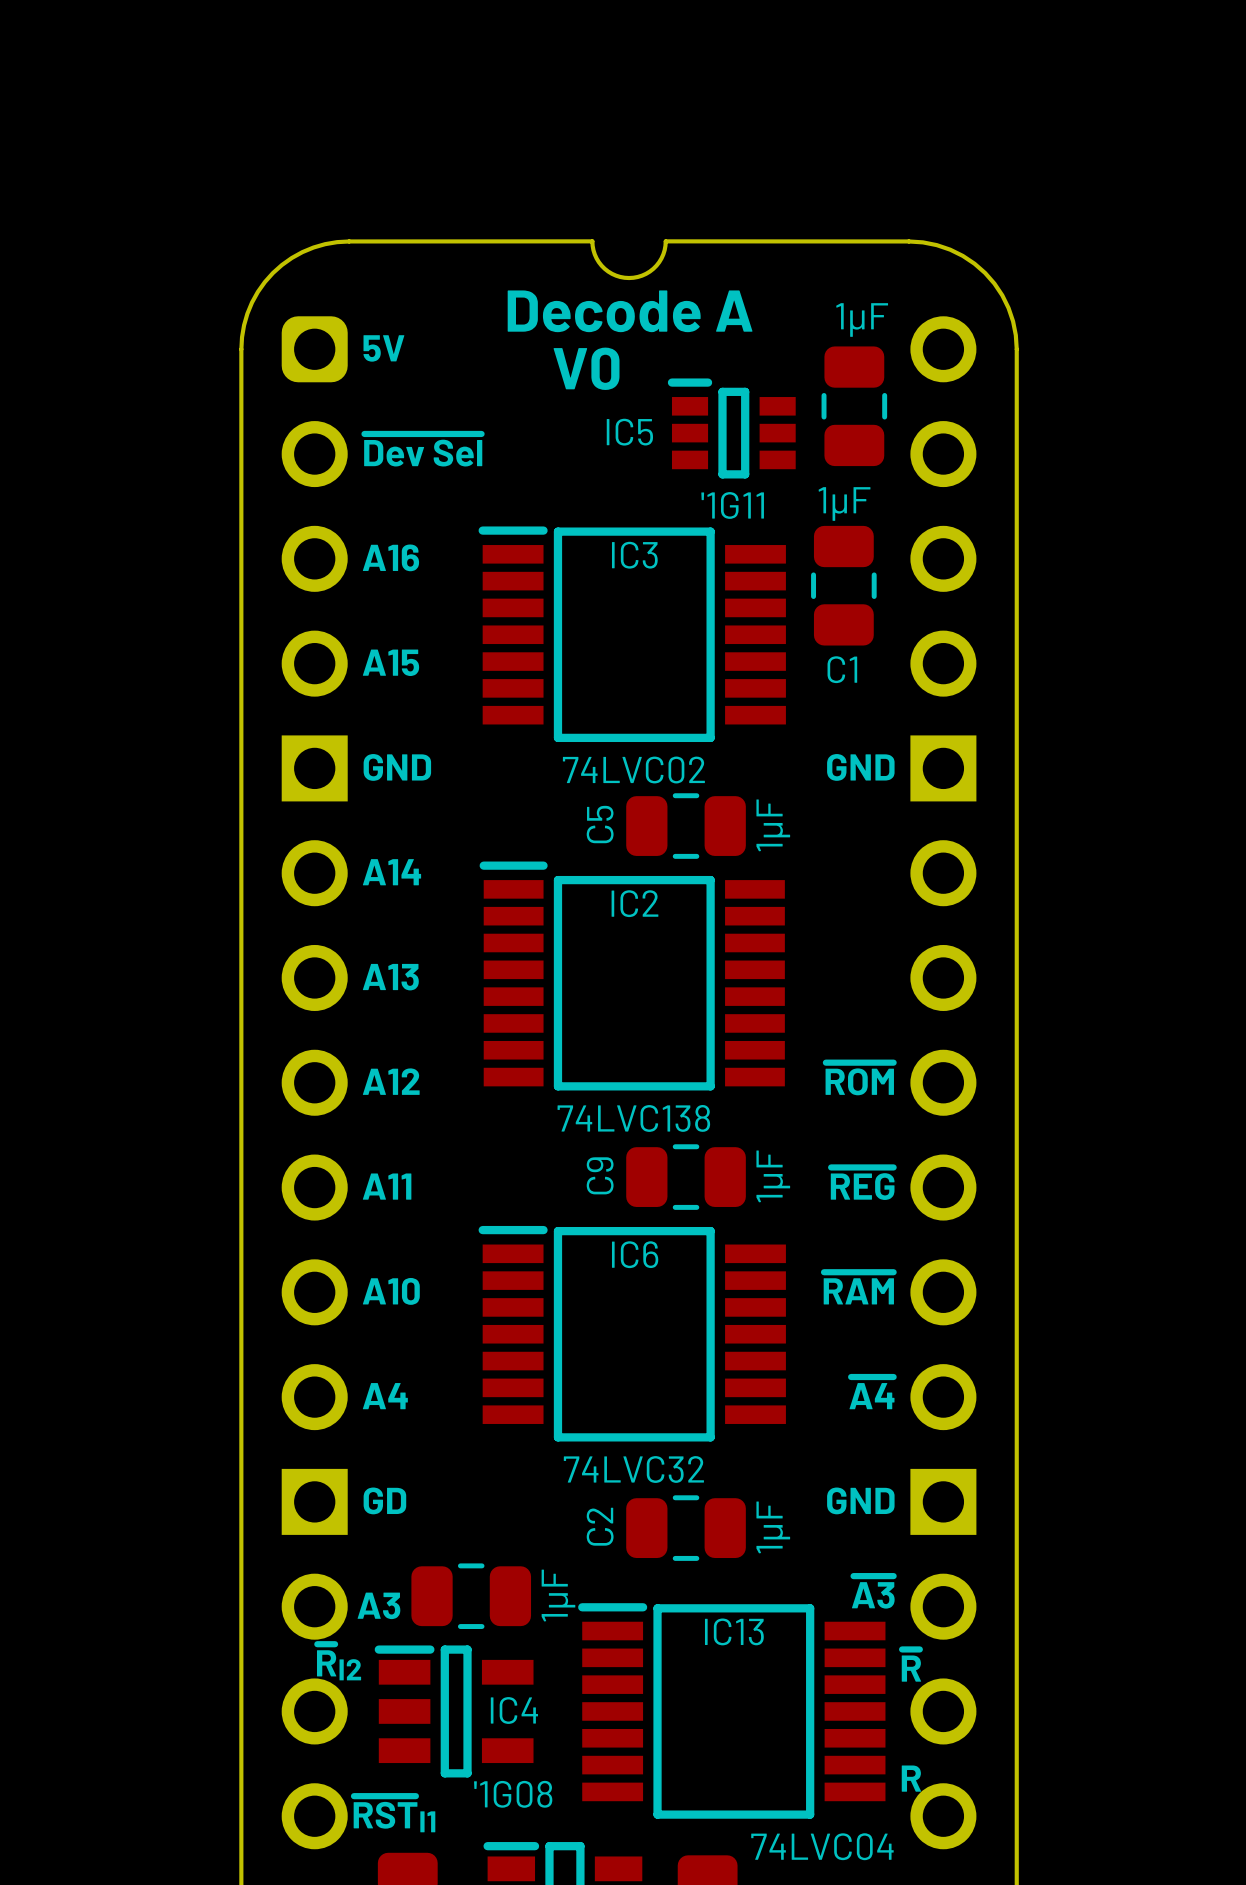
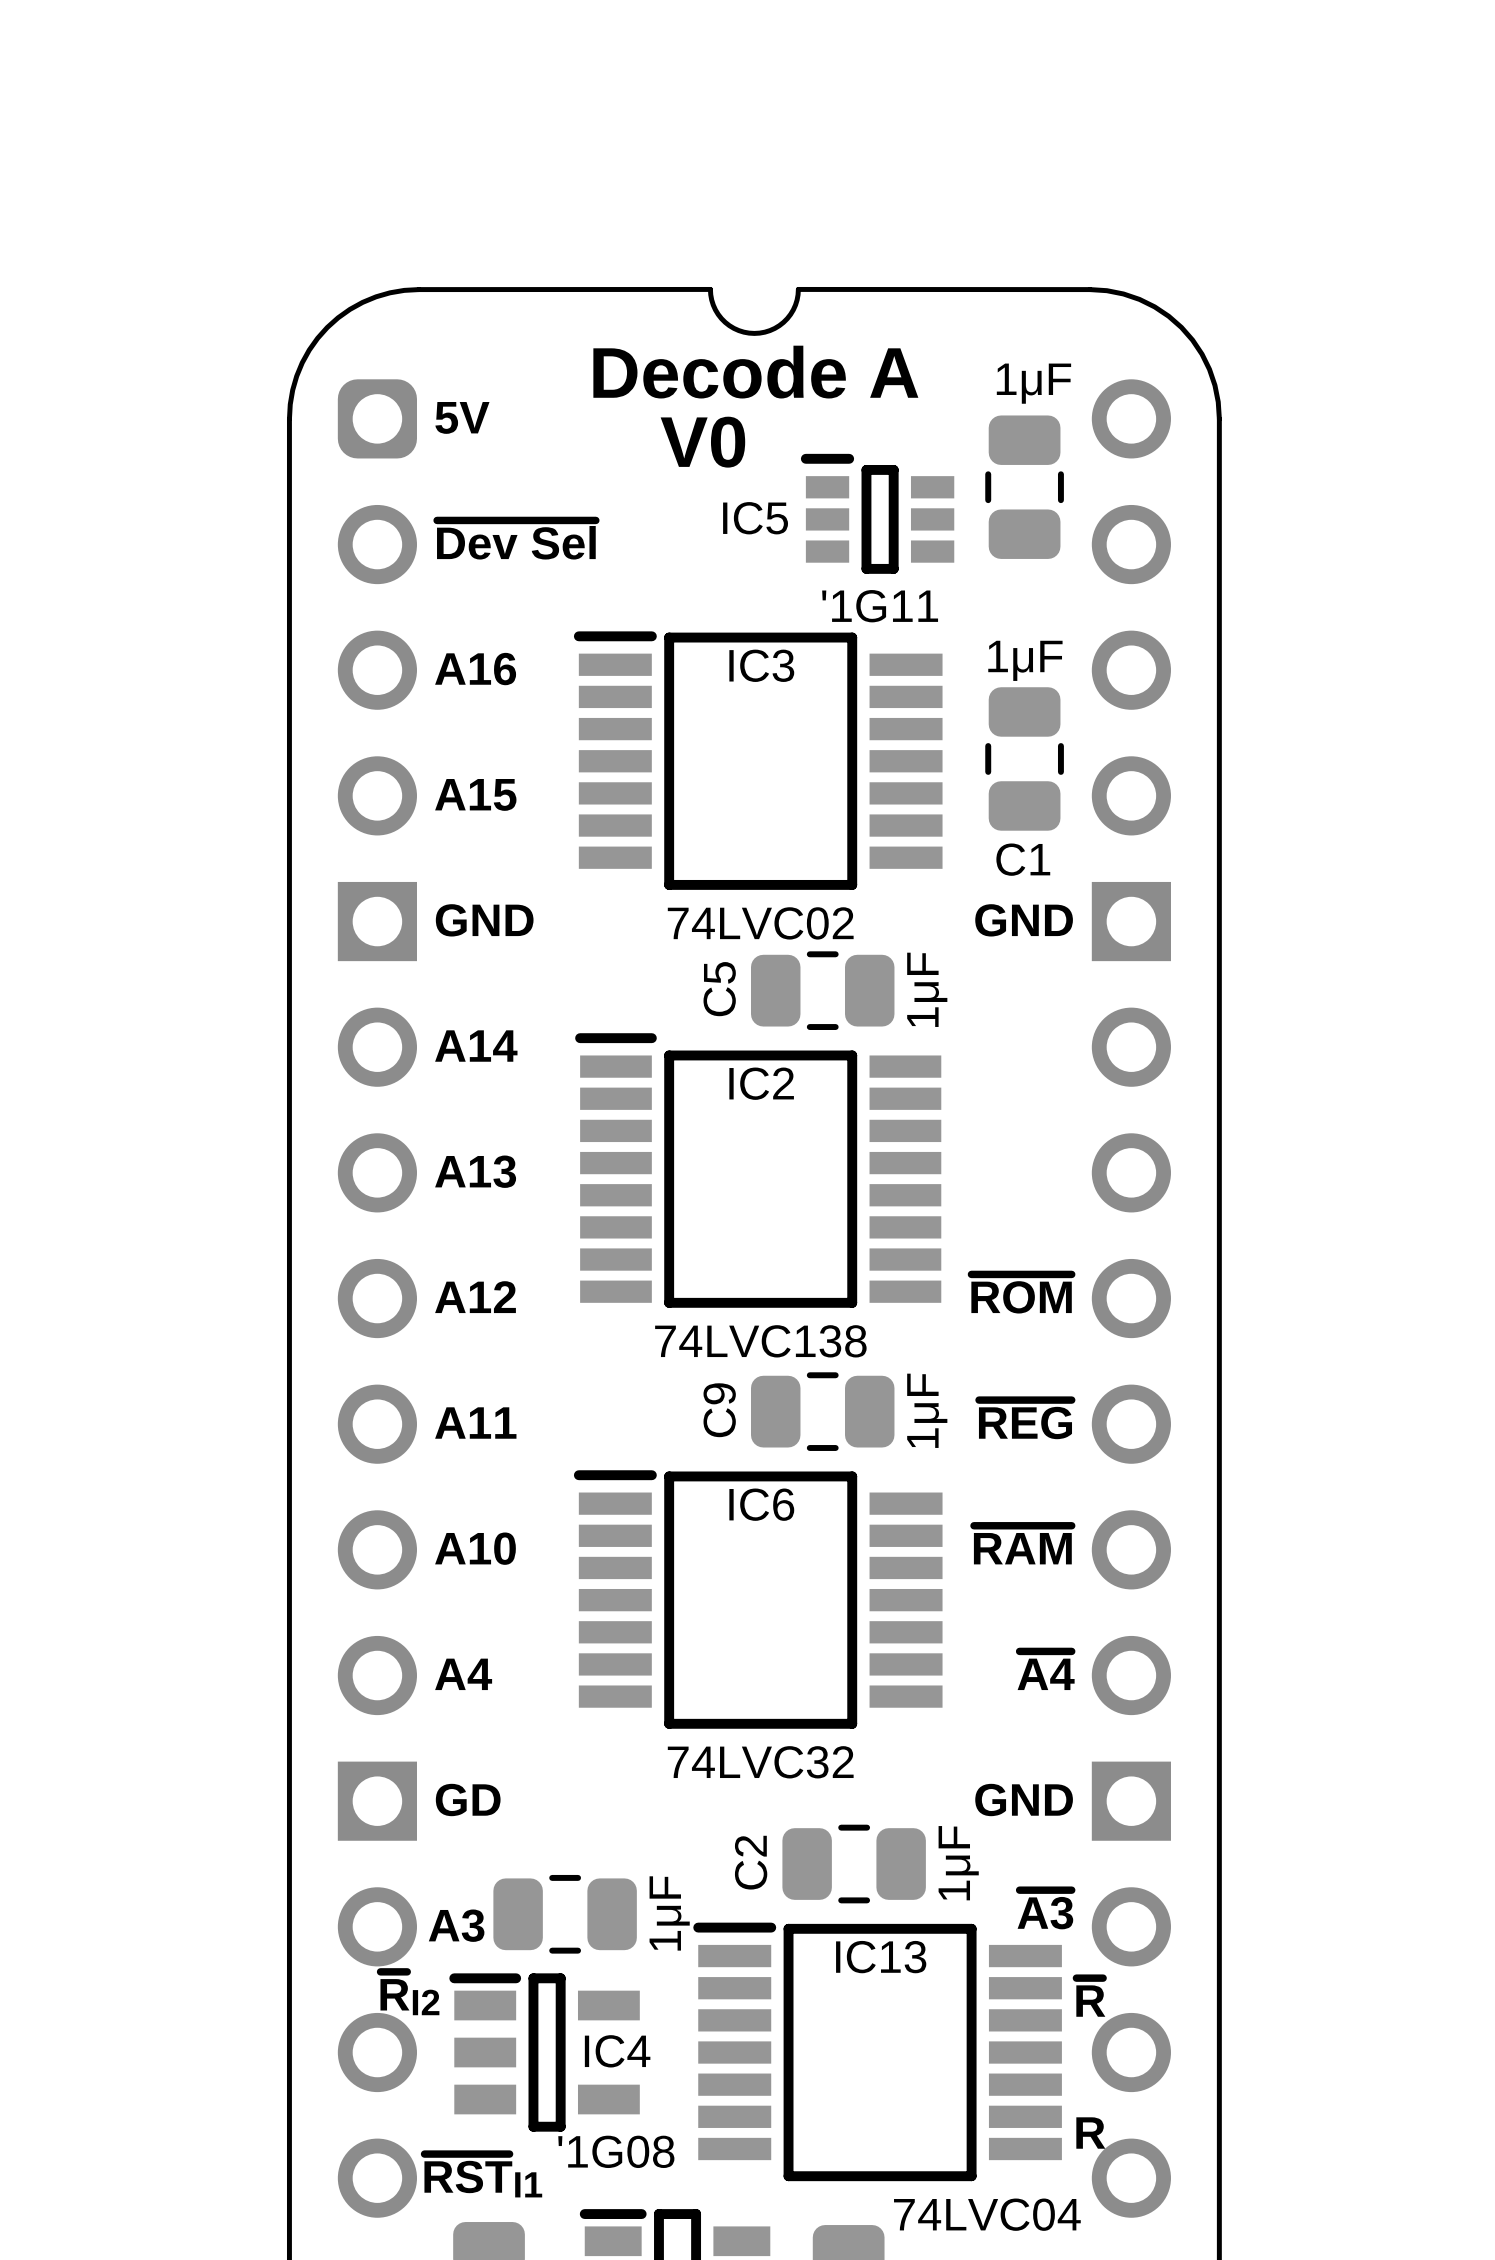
C1 position: (843, 585) -> (1024, 758)
C2 position: (686, 1528) -> (854, 1864)

